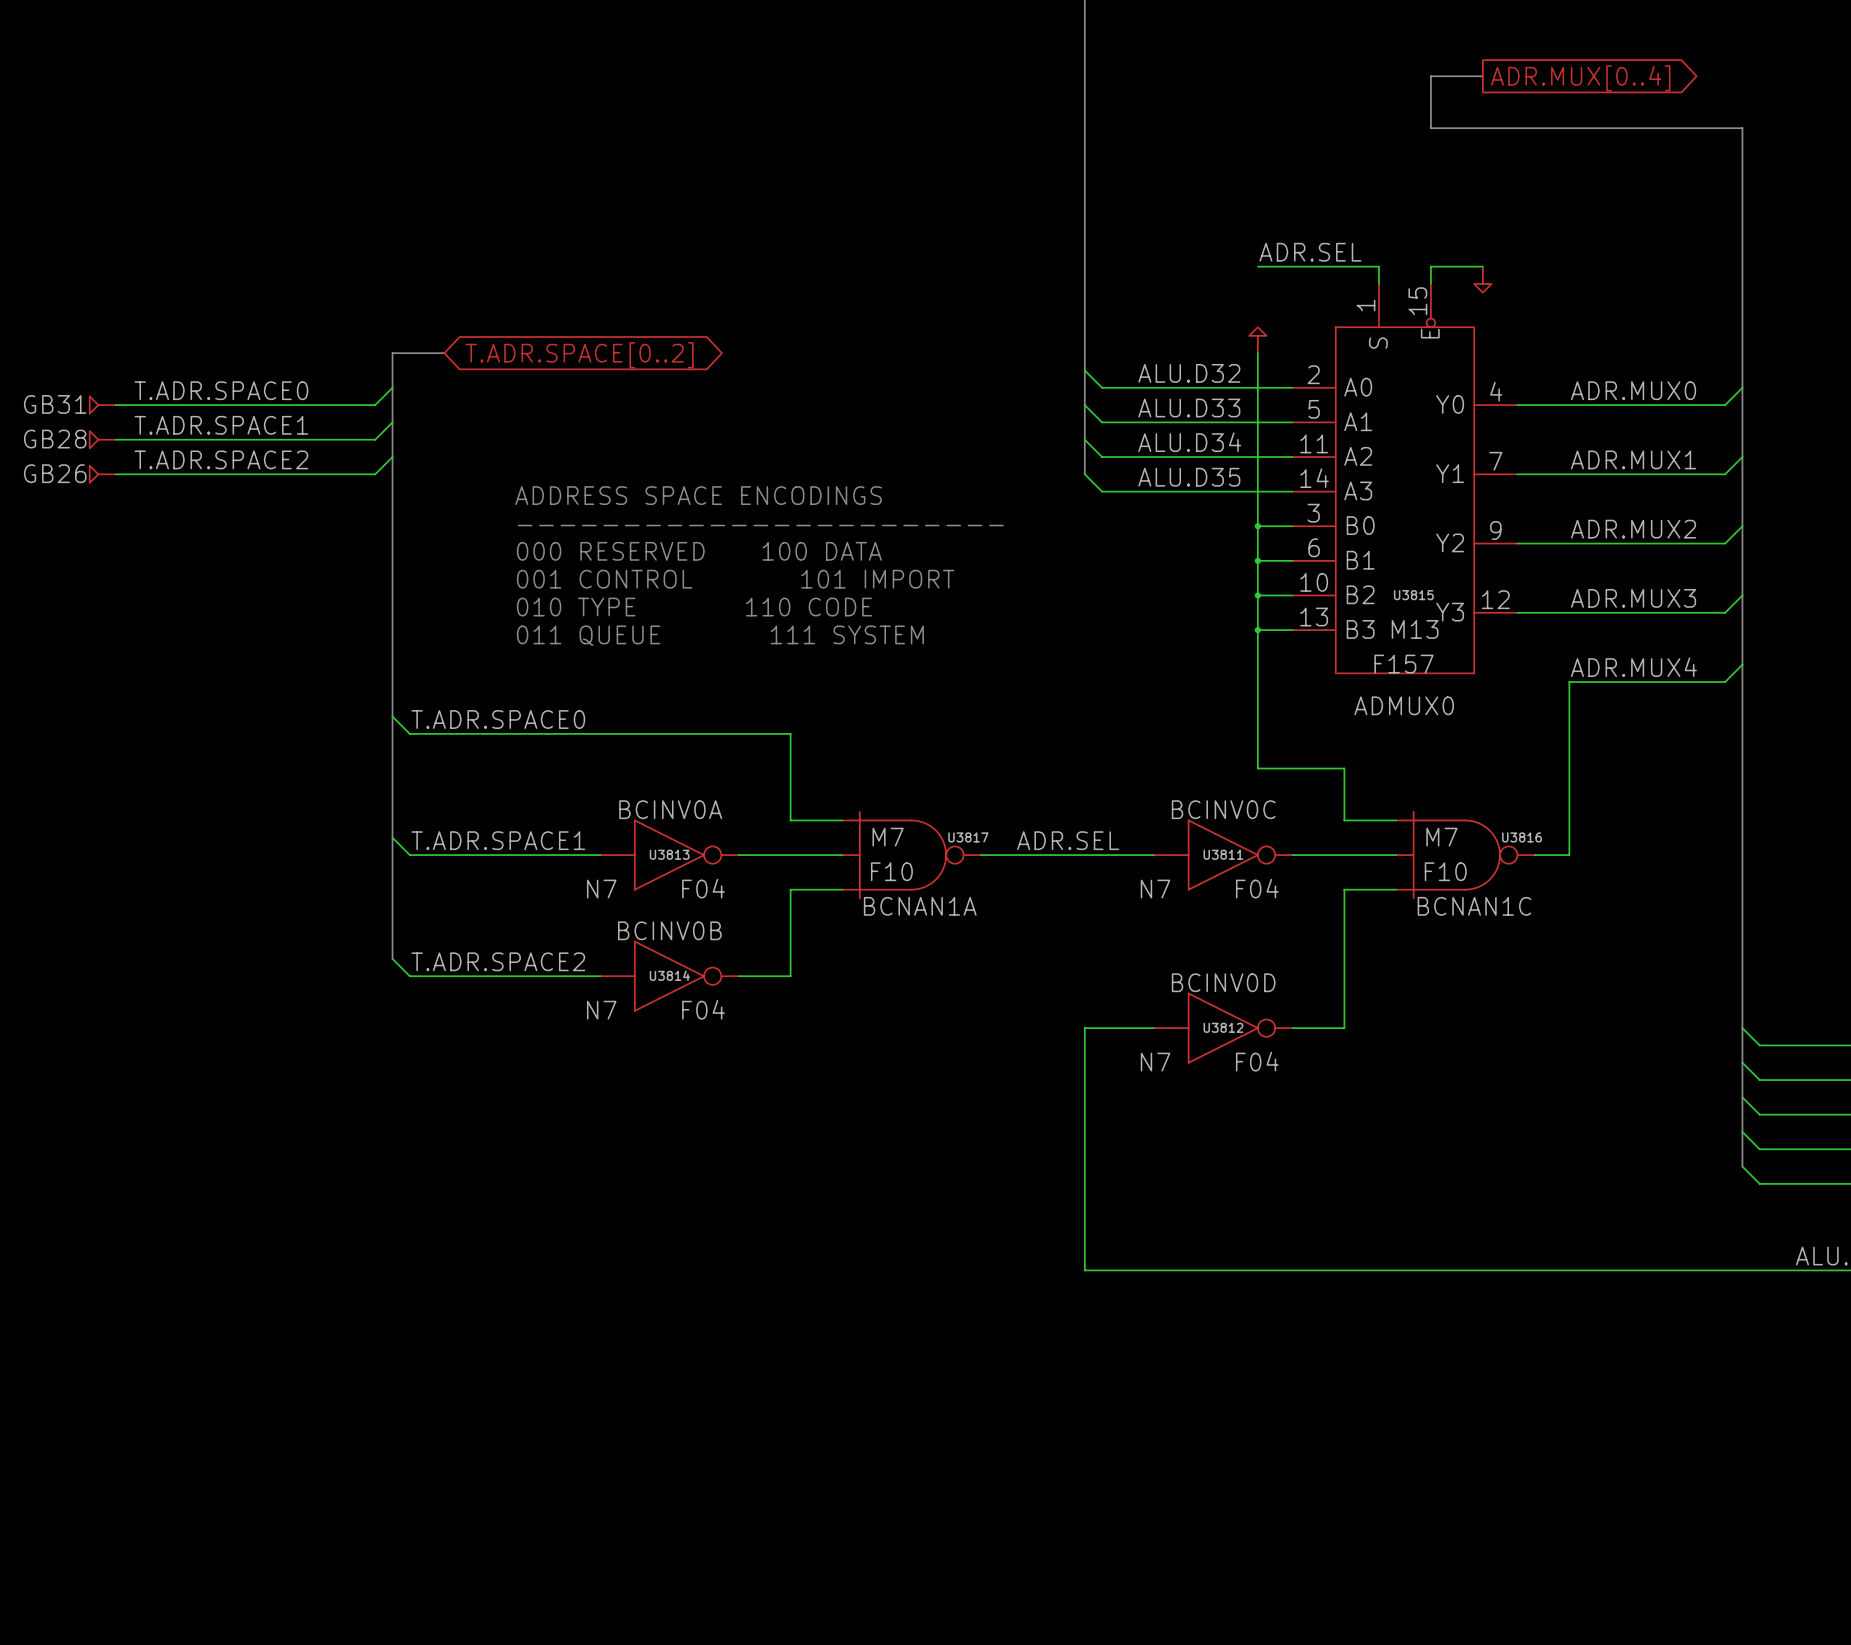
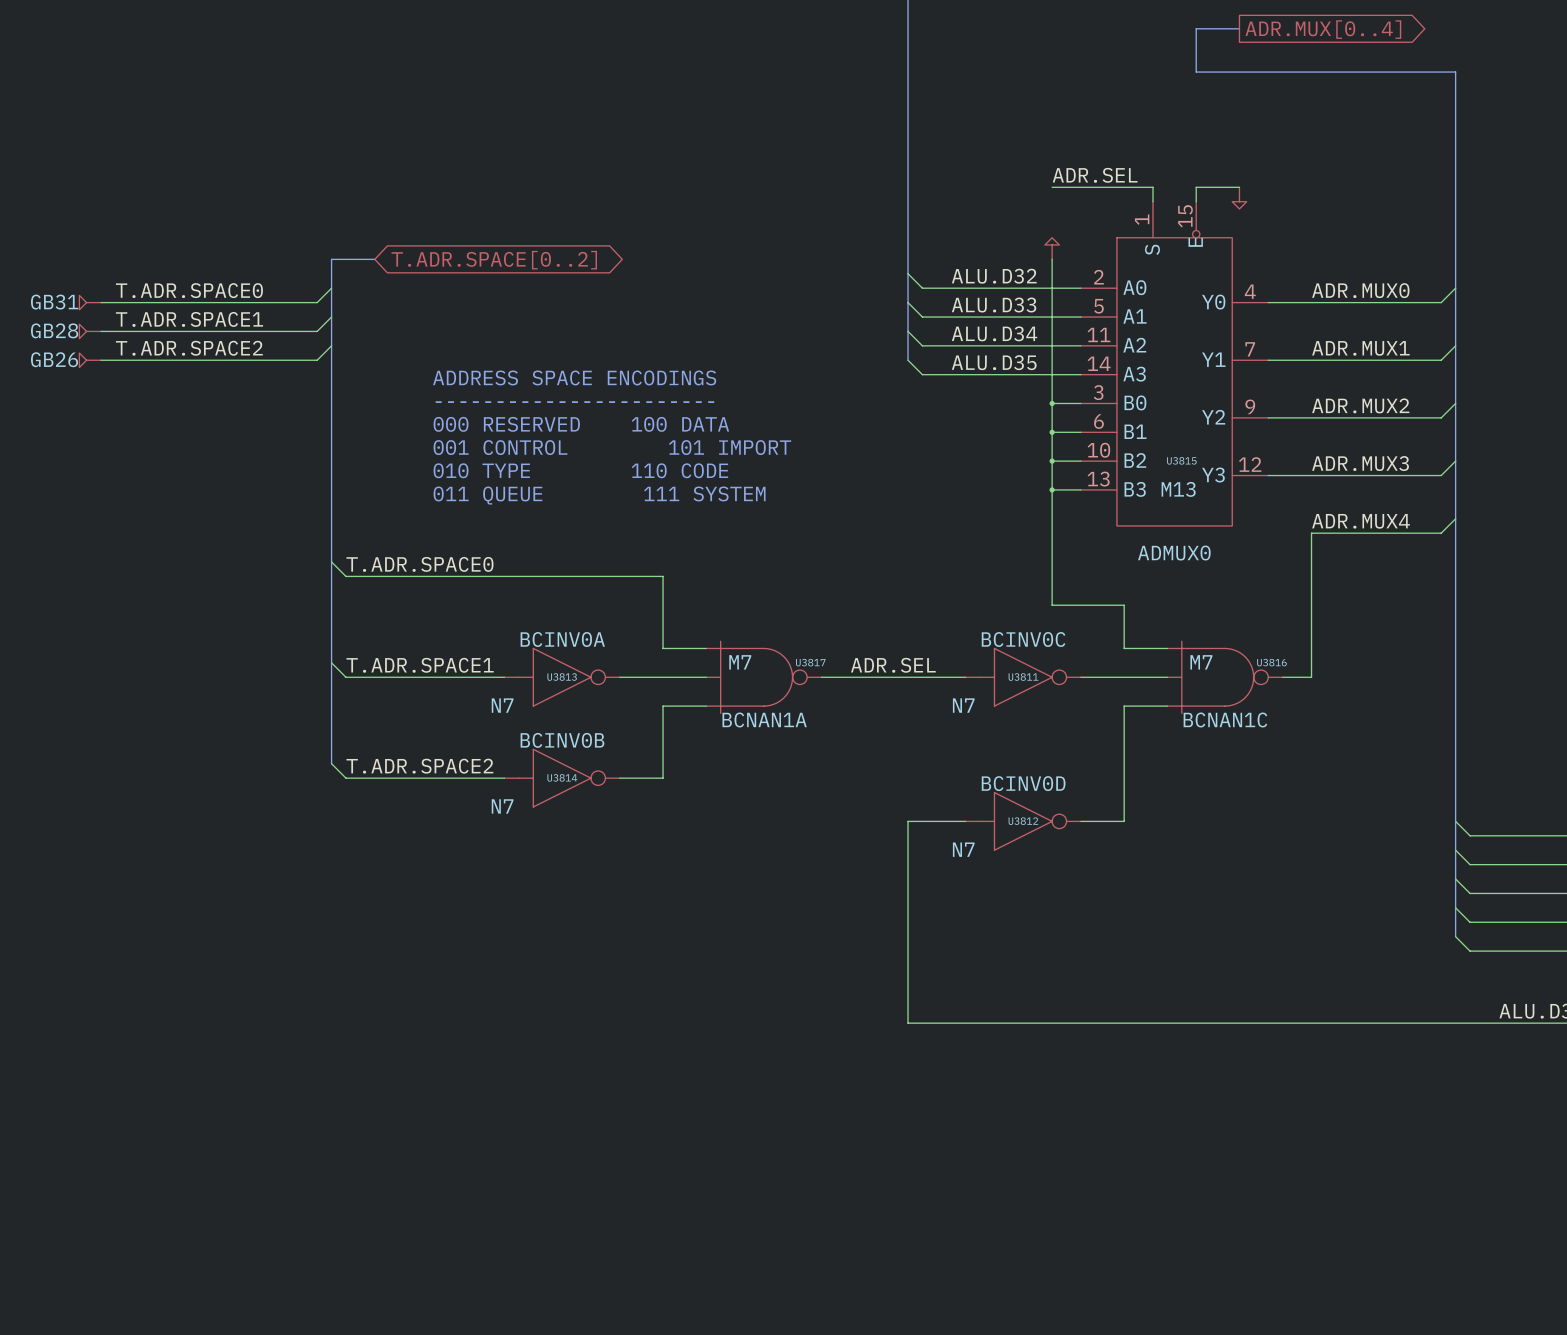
U3815 value: F157 (1404, 664) -> none
U3817 value: F10 (891, 871) -> none
U3816 value: F10 (1445, 871) -> none
U3813 value: F04 (703, 888) -> none
U3811 value: F04 (1257, 888) -> none
U3814 value: F04 (703, 1009) -> none
U3812 value: F04 (1257, 1061) -> none

